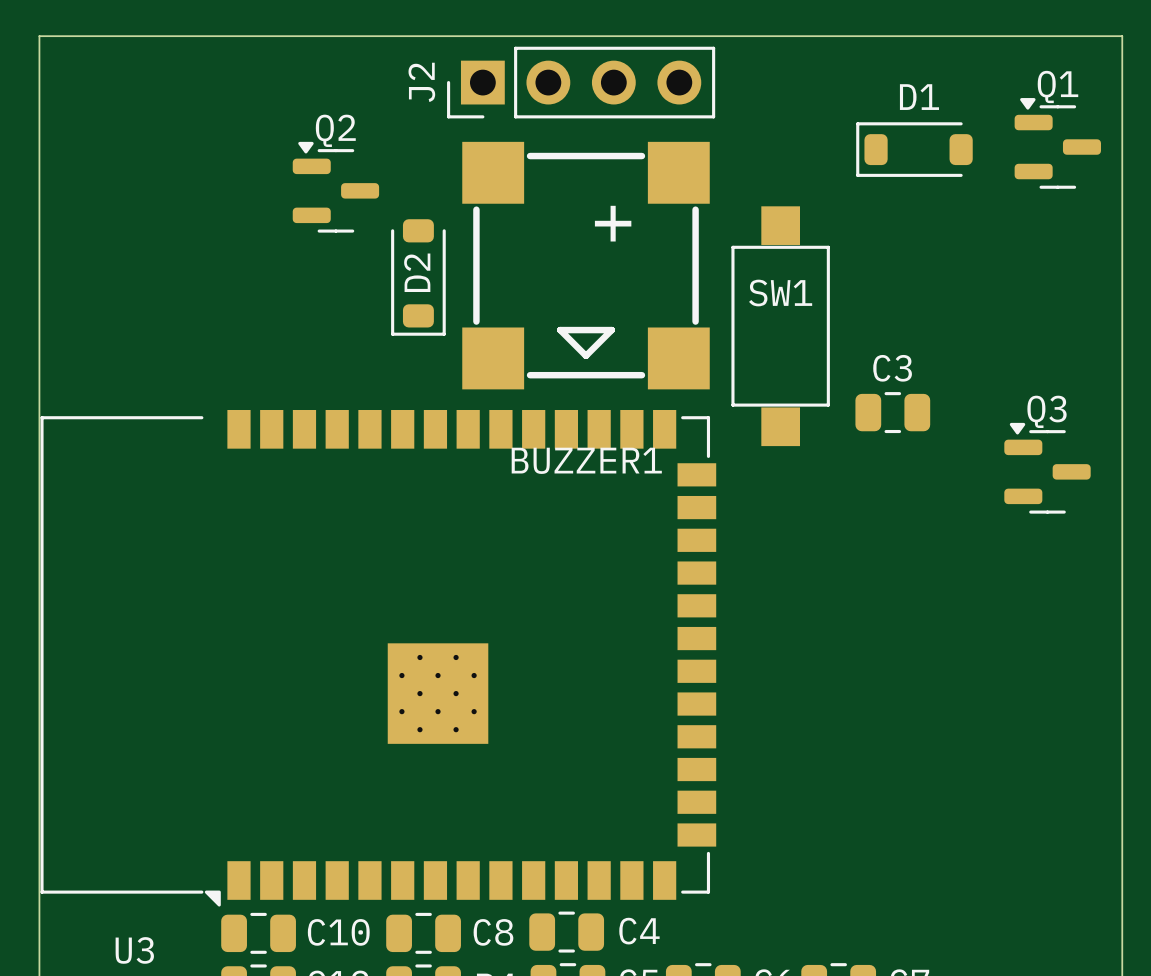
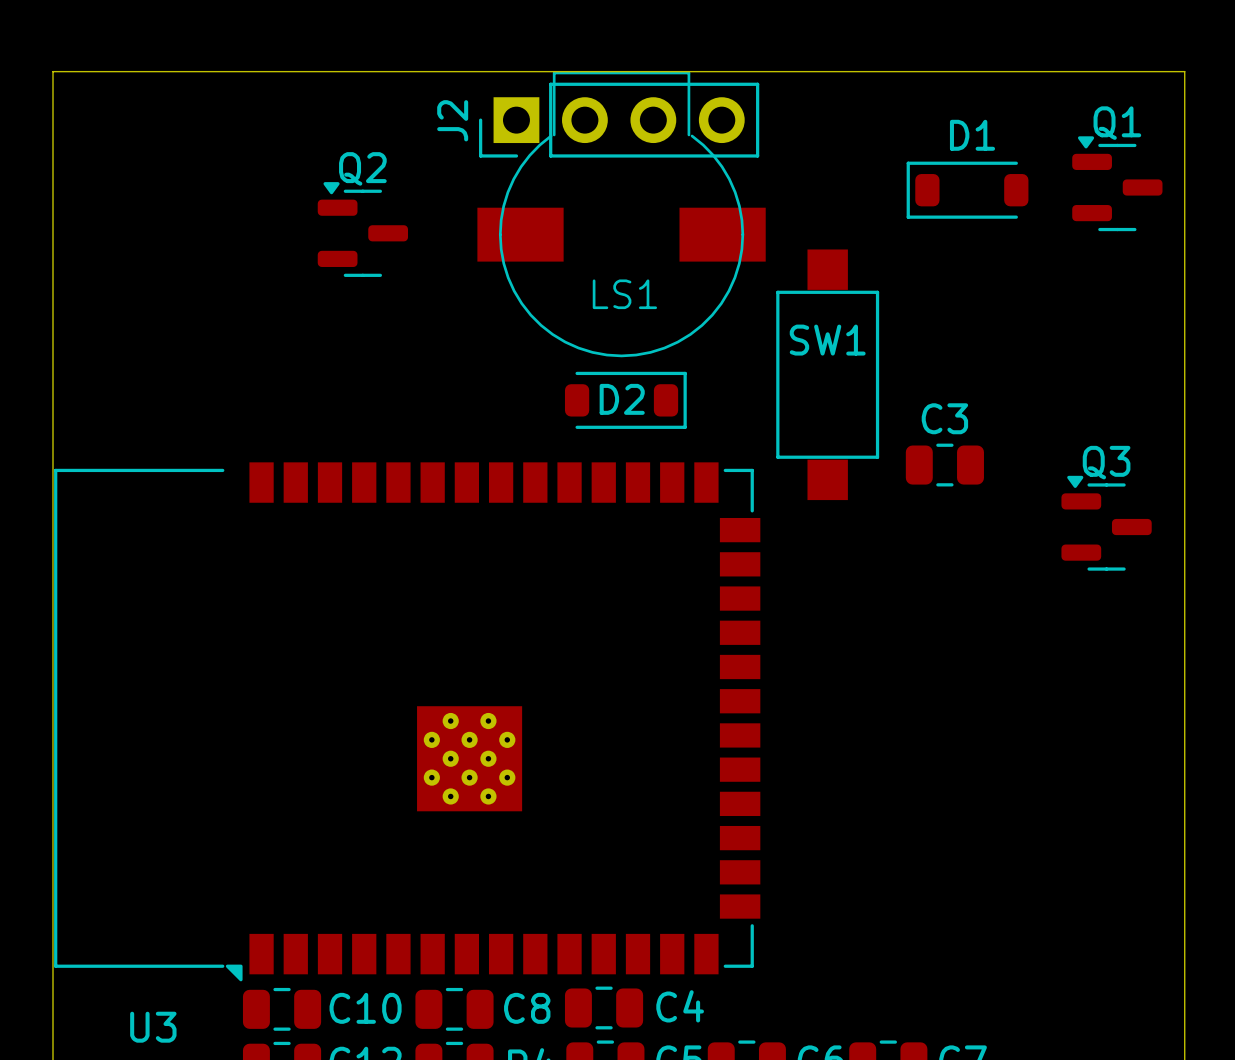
LS1: none -> (621, 214)
BUZZER1: (586, 265) -> none
D2 rotation: 0° (418, 277) -> 90° counterclockwise (625, 400)
D2 position: (418, 277) -> (625, 400)

